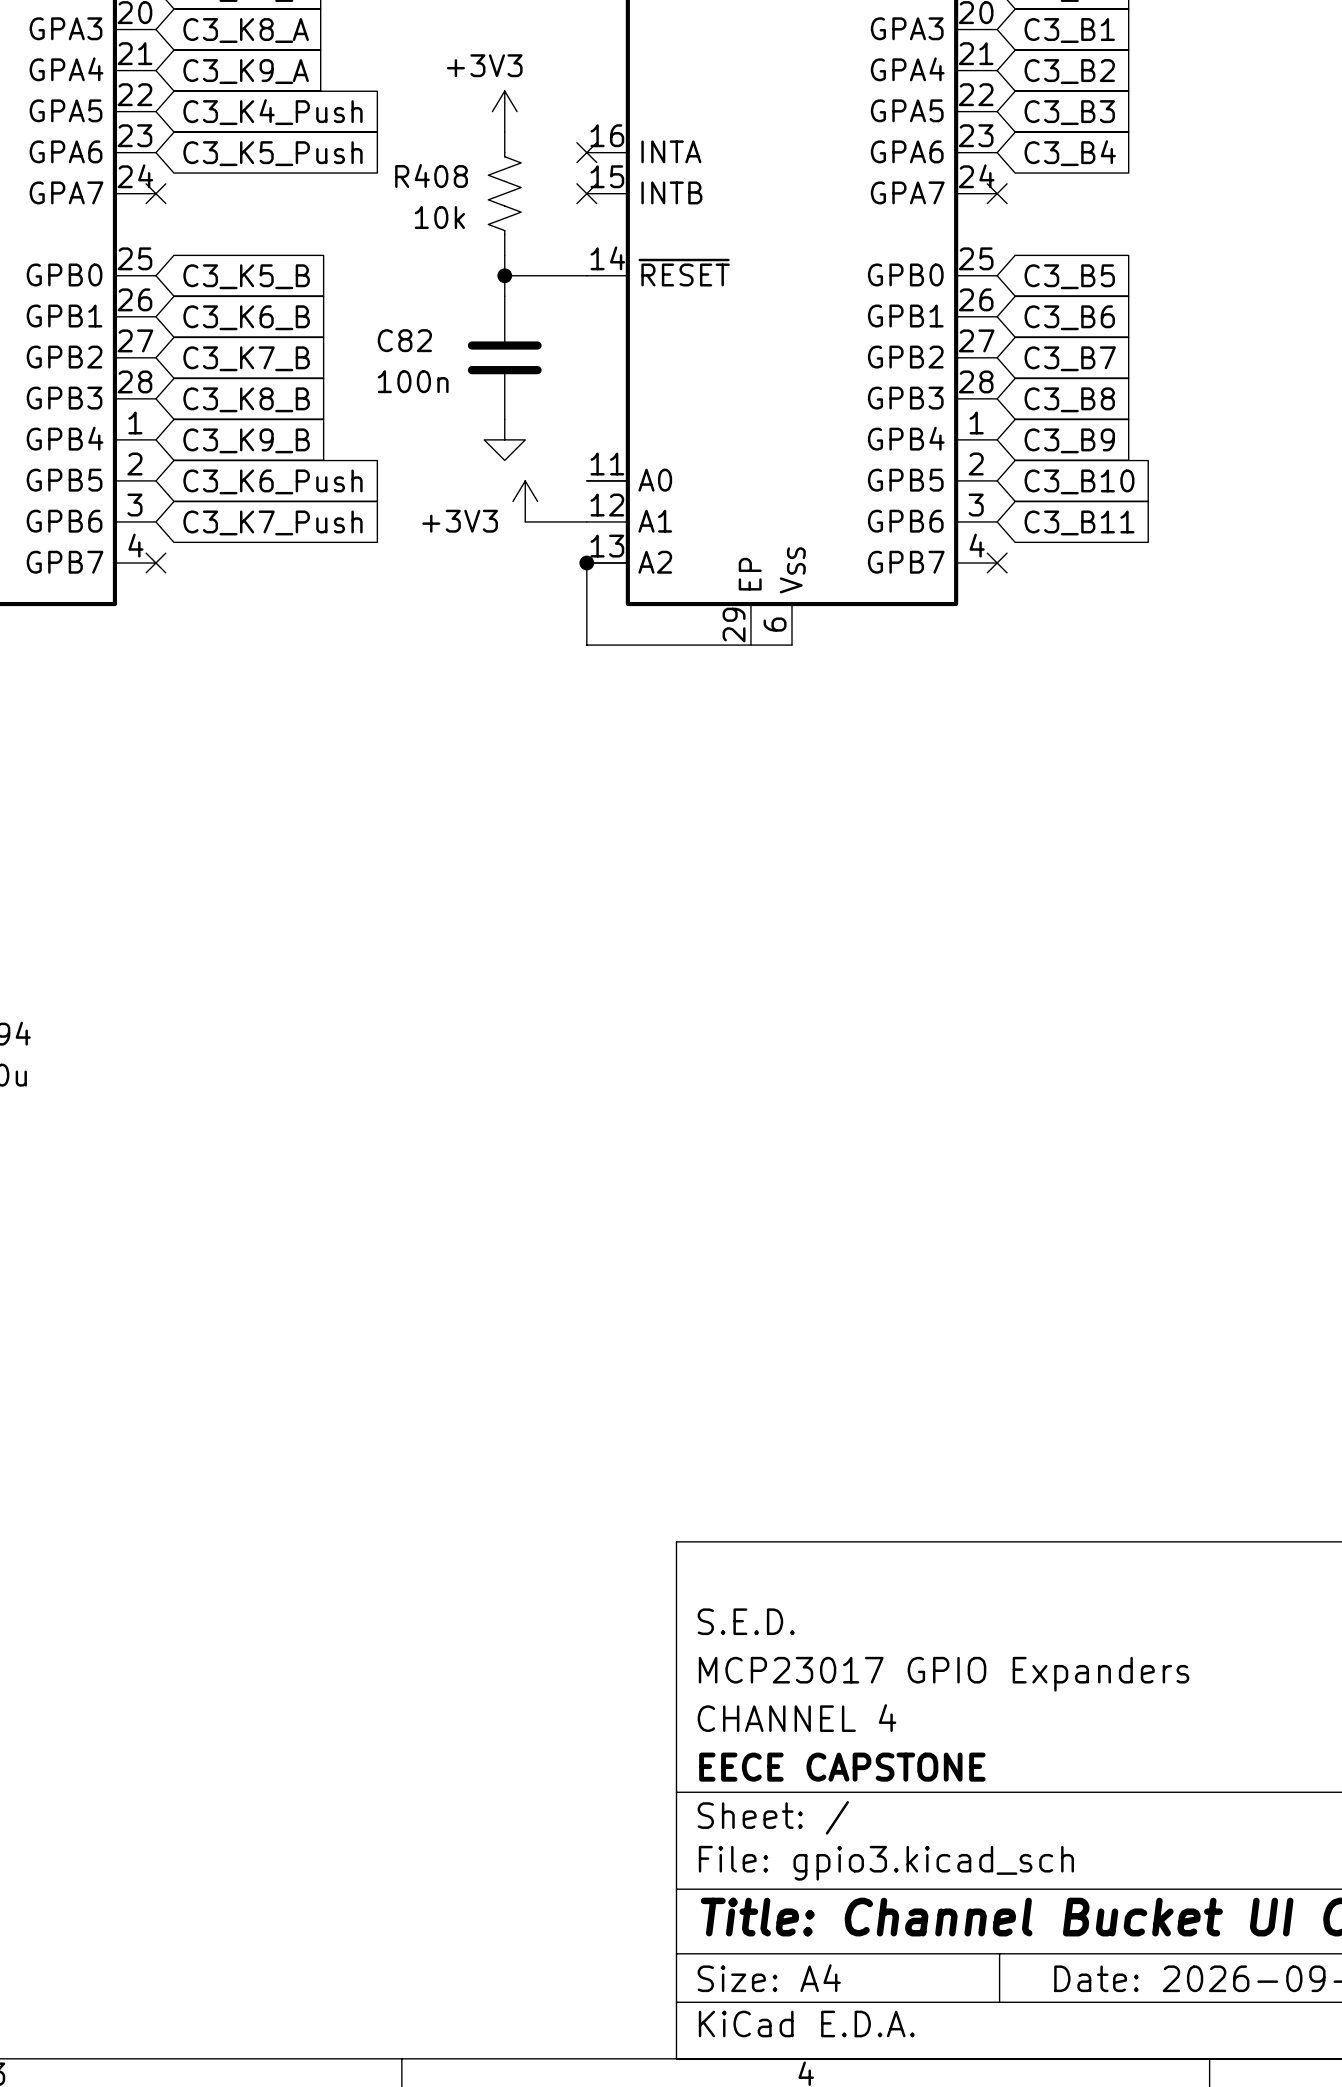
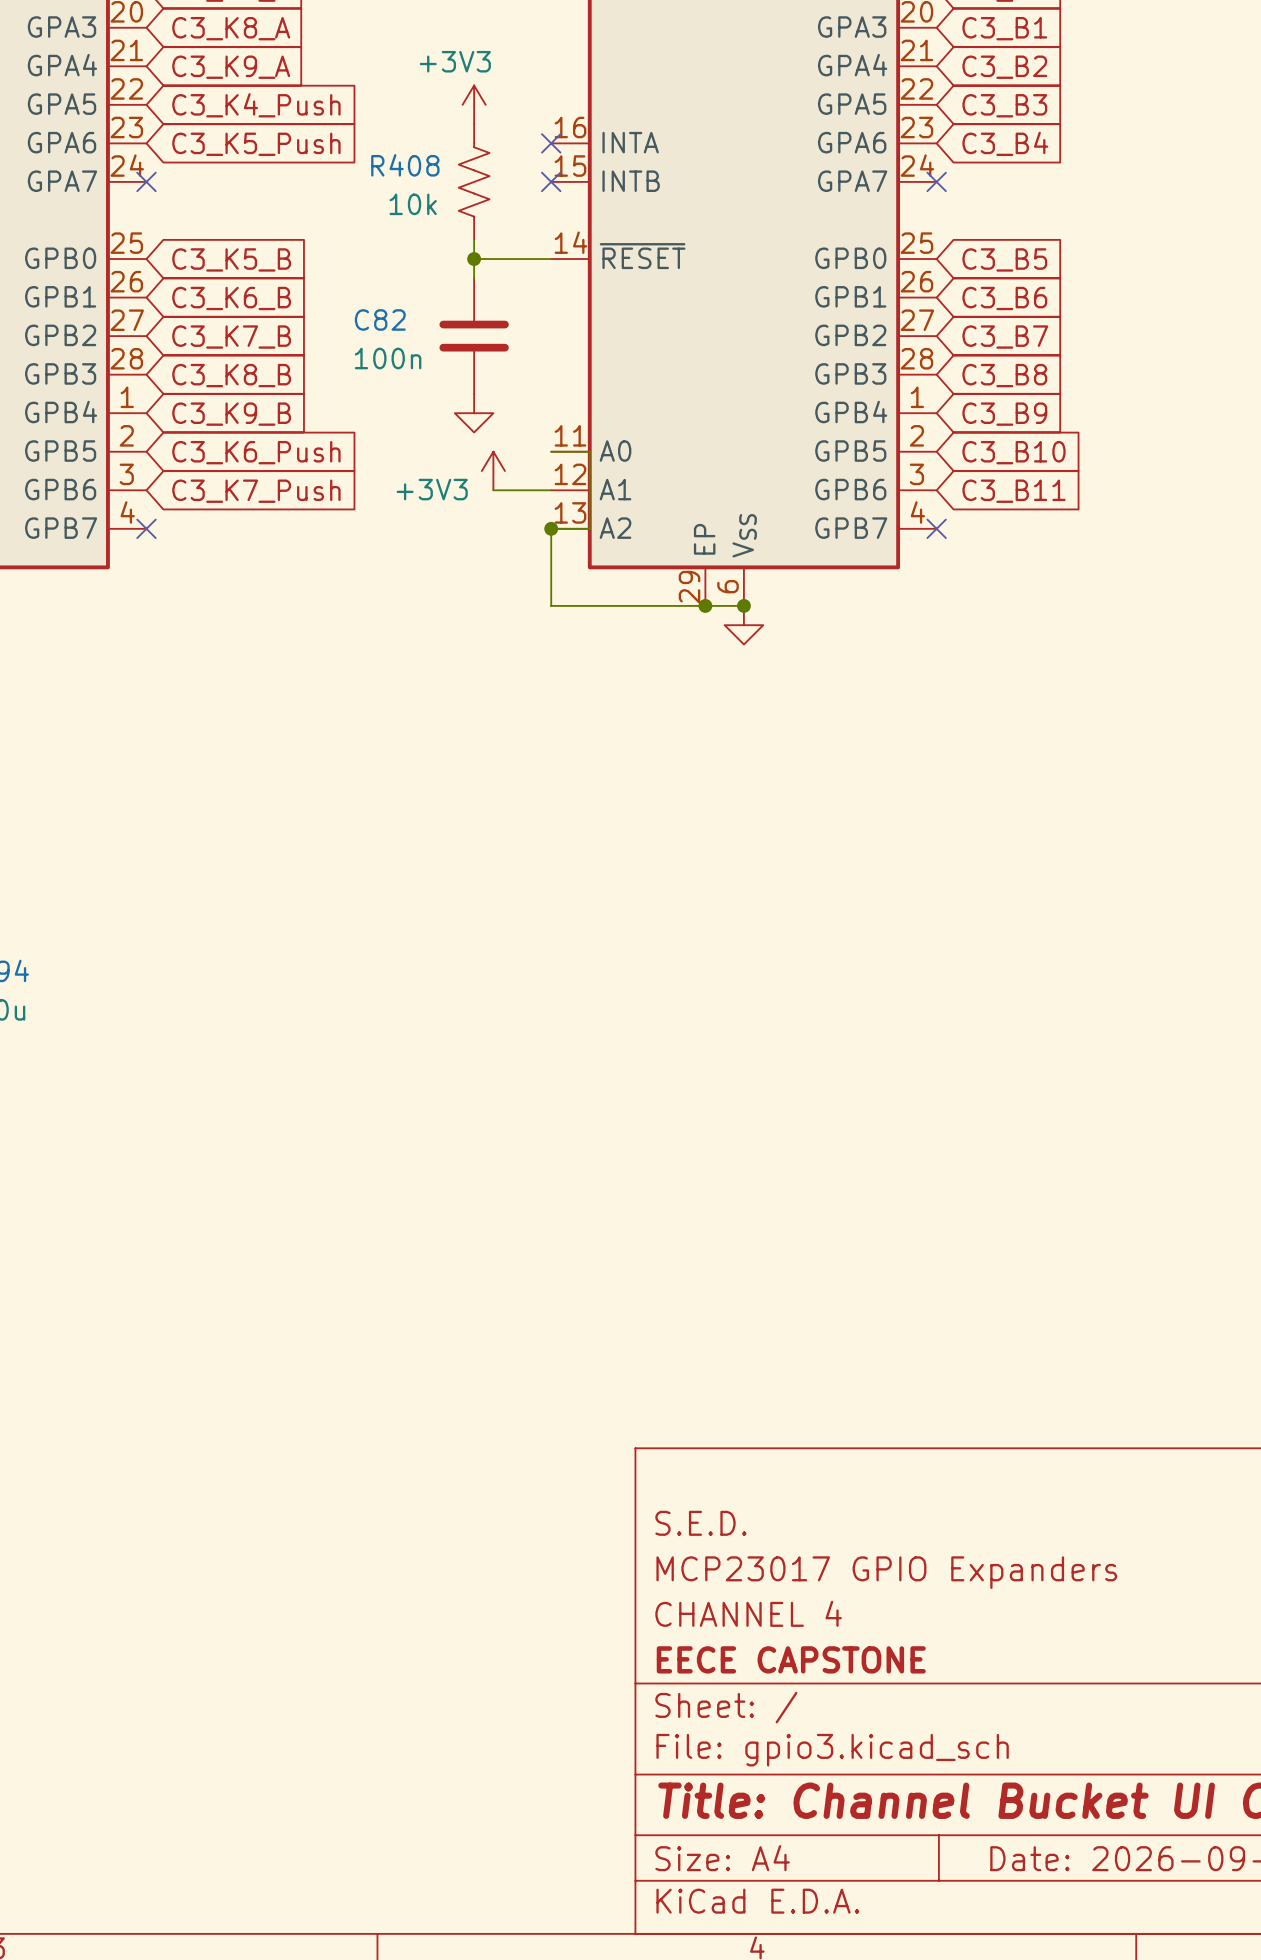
junction: none -> (705, 605)
junction: none -> (743, 605)
power symbol: none -> (743, 625)

